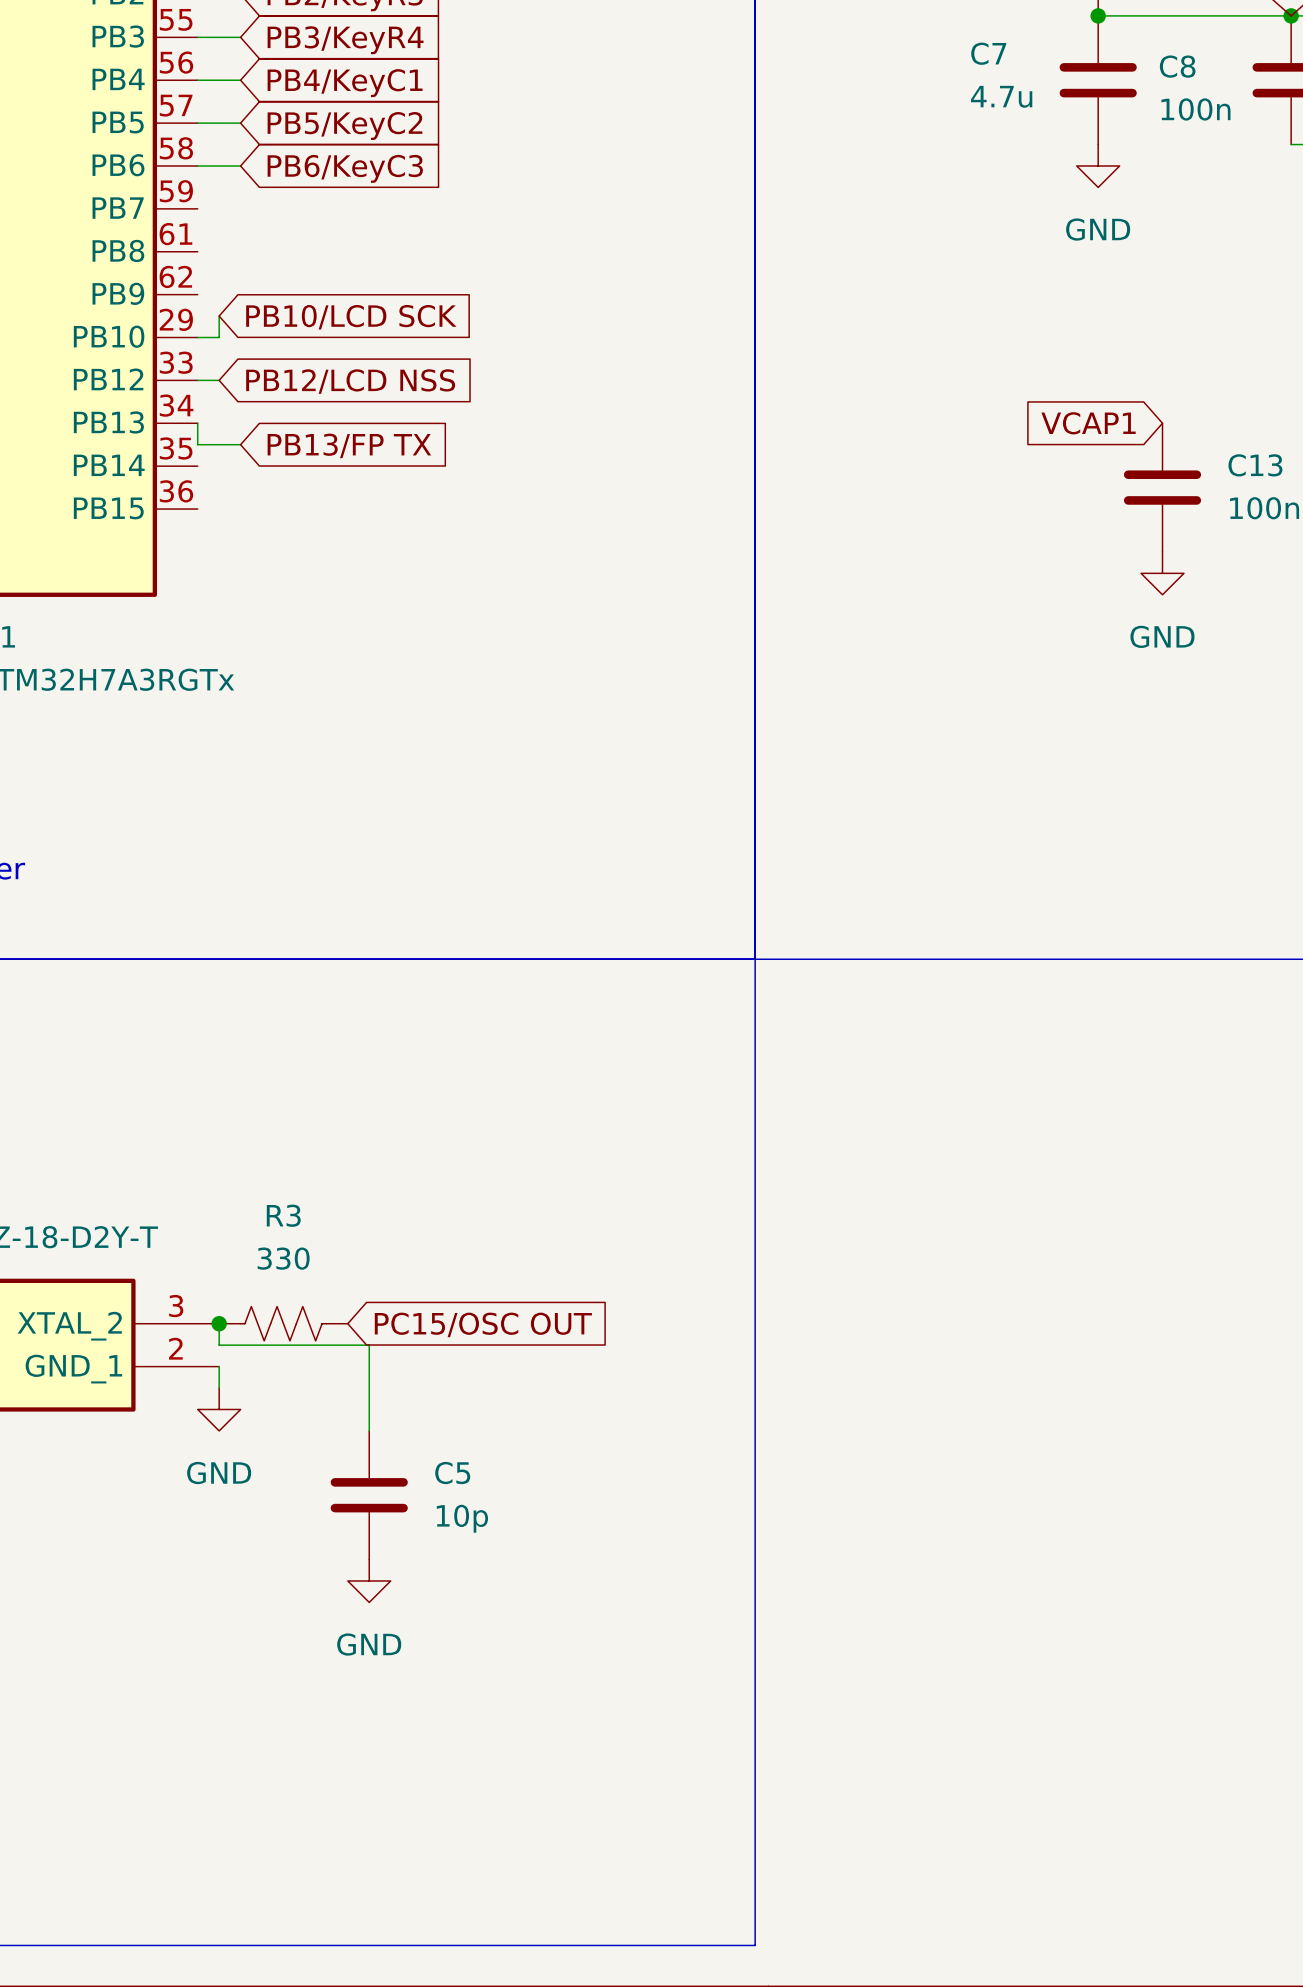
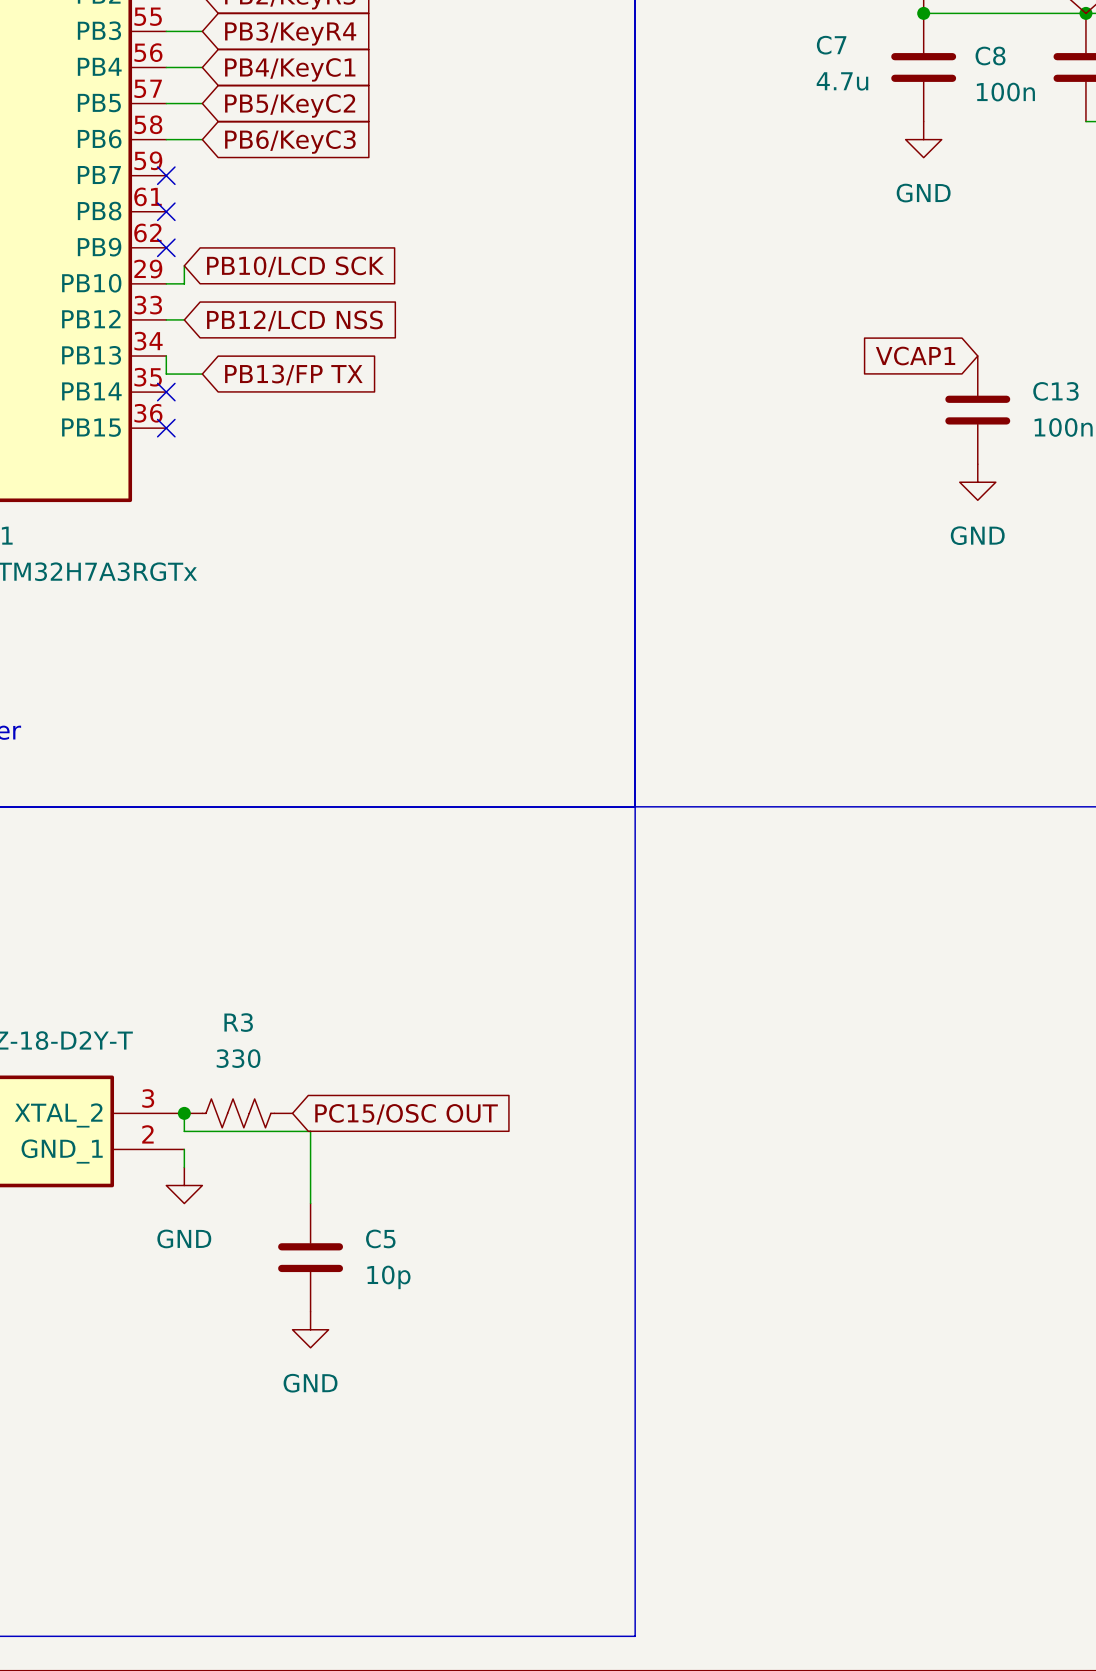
no-connect mark: none -> (166, 175)
no-connect mark: none -> (166, 211)
no-connect mark: none -> (166, 247)
no-connect mark: none -> (166, 392)
no-connect mark: none -> (166, 428)

